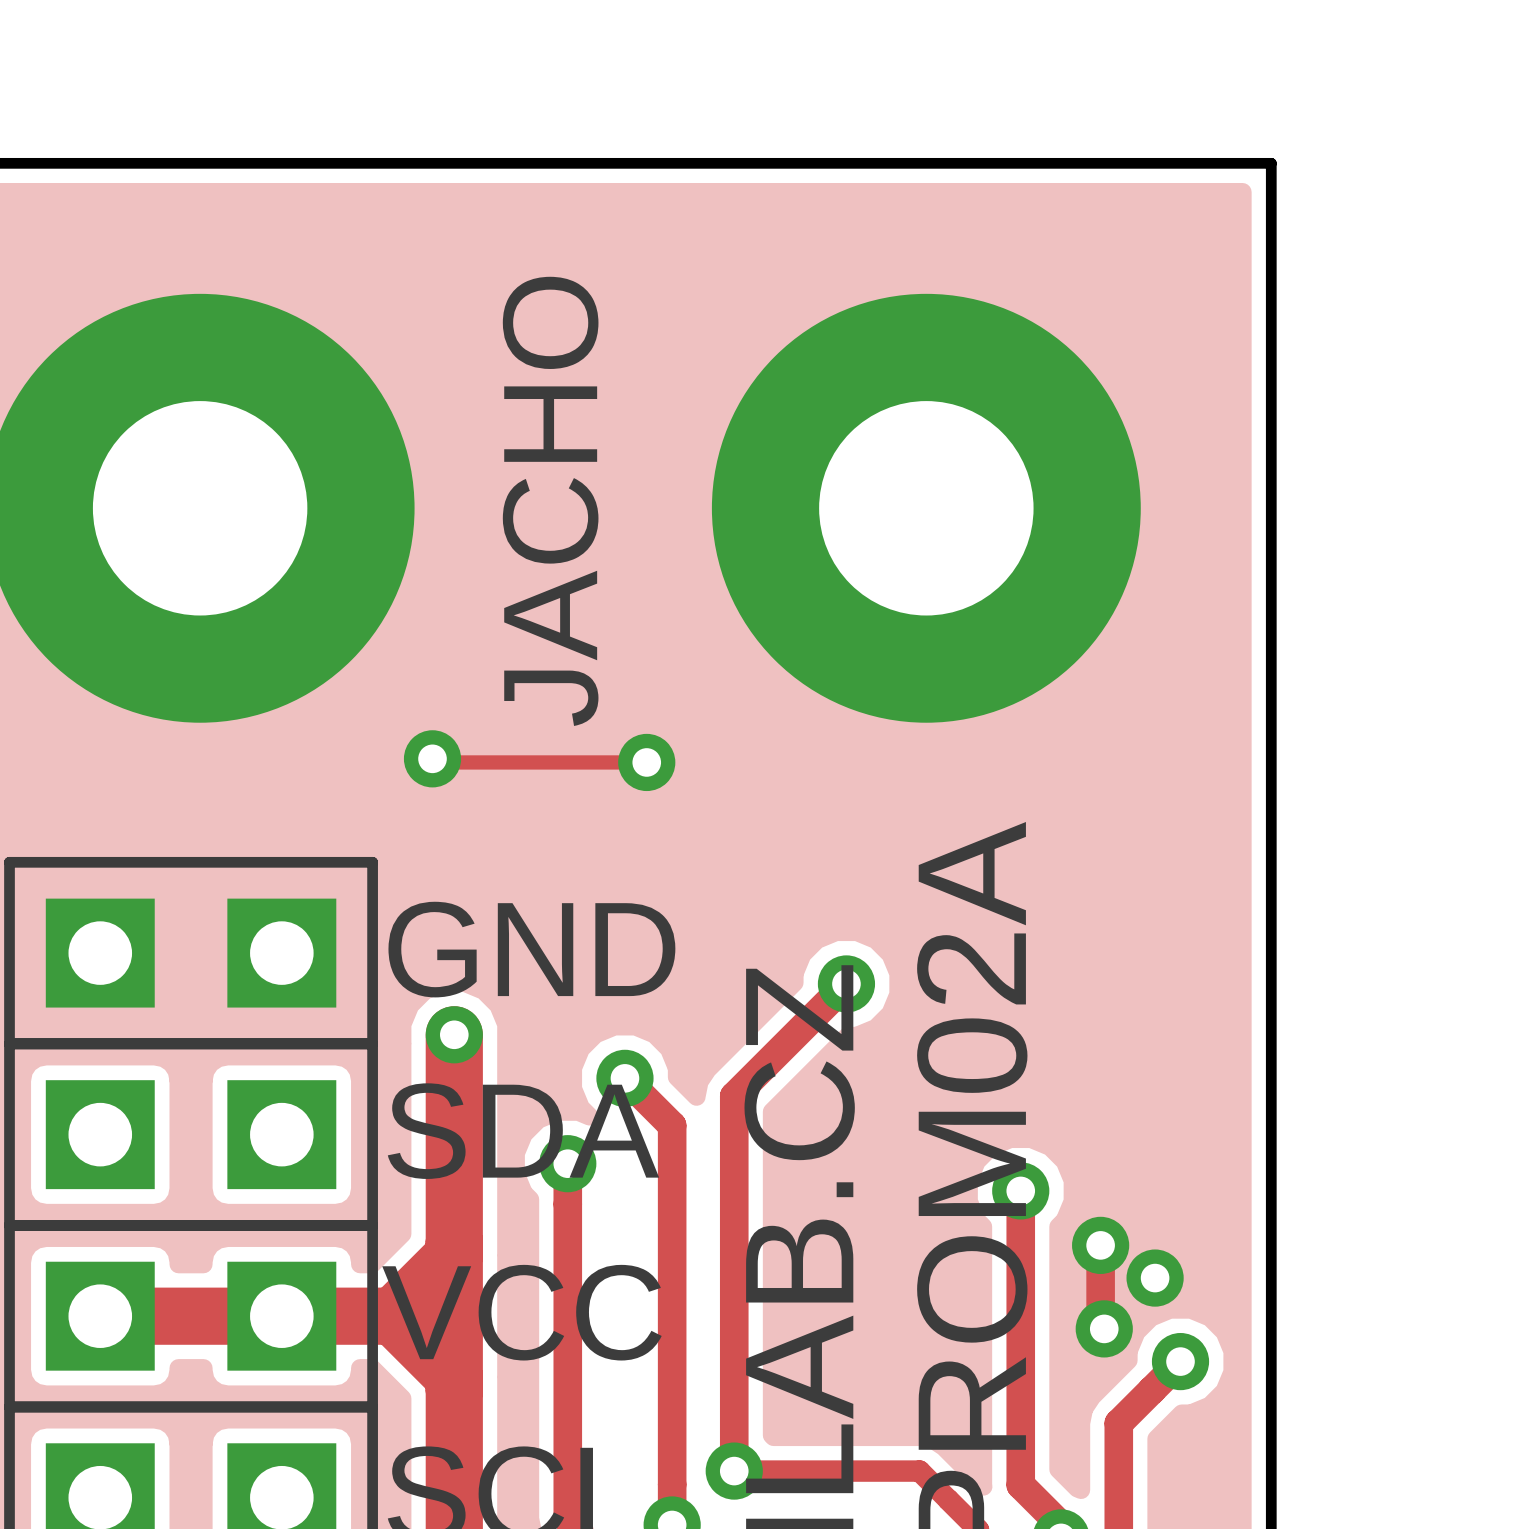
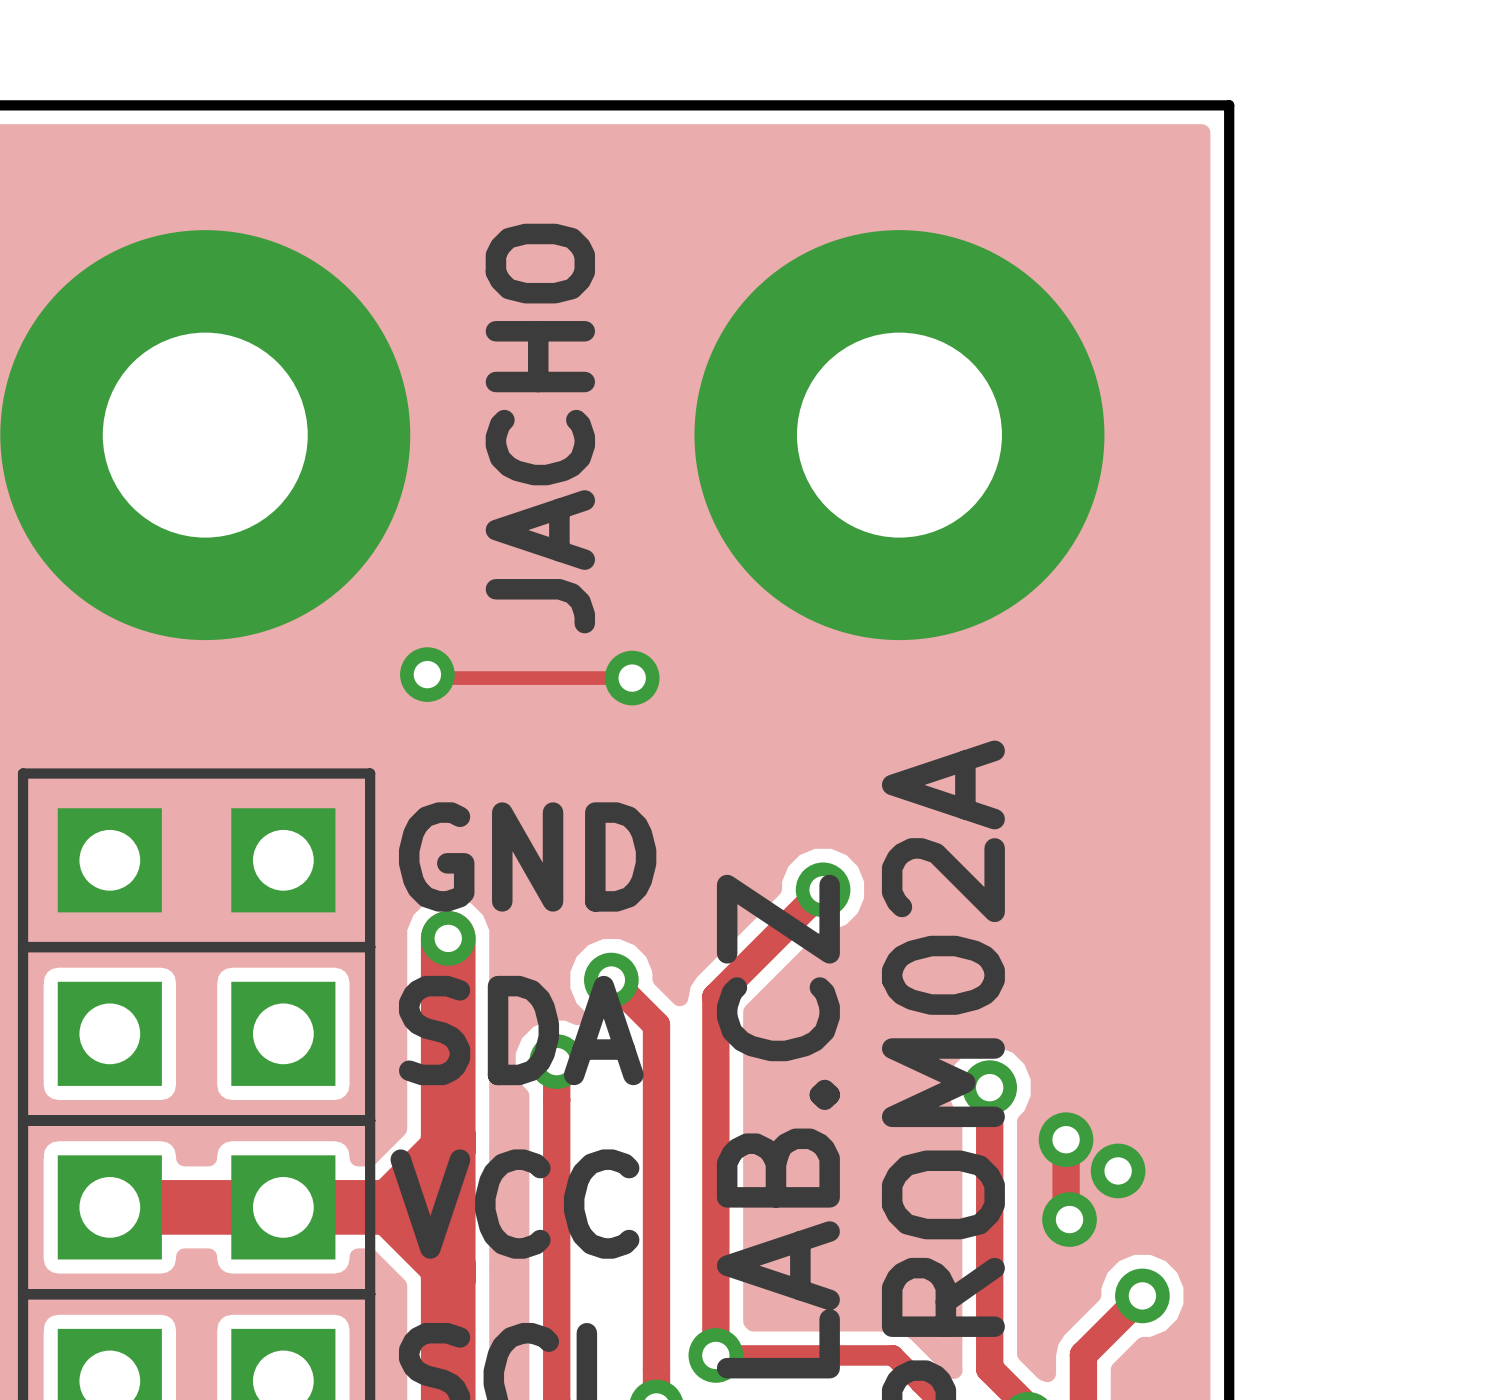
track: (1180, 1361) (1118, 1423) (1118, 1470) -> (1142, 1295) (1083, 1354)
via position: (1180, 1361) -> (1142, 1295)

